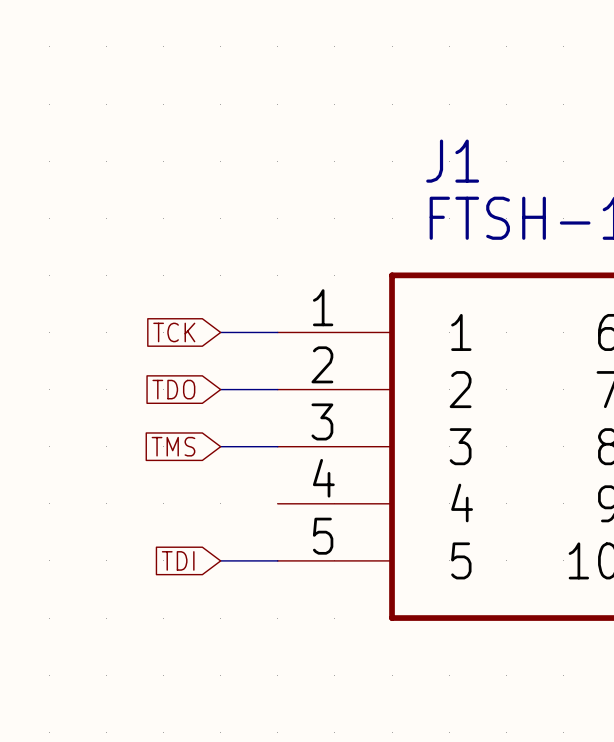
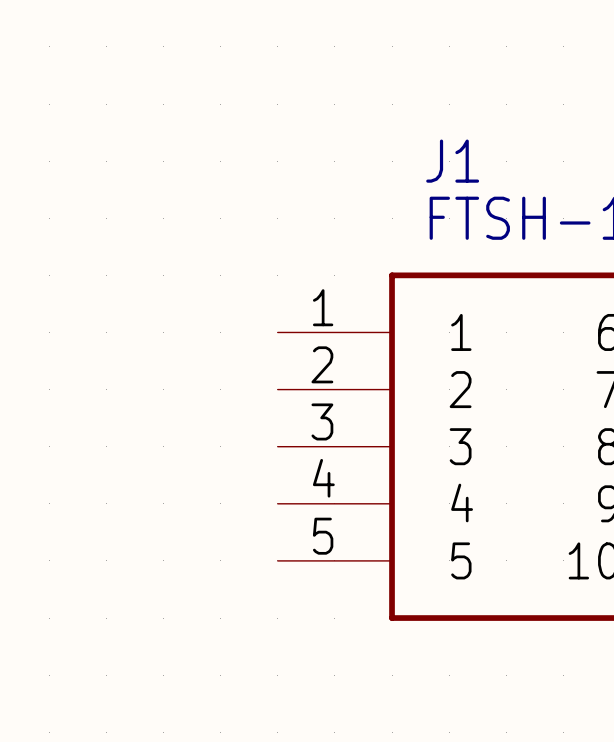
global label: TCK (174, 332) -> none
wire: (220, 332) (277, 332) -> none
global label: TDO (173, 389) -> none
wire: (220, 389) (277, 389) -> none
global label: TMS (173, 446) -> none
wire: (220, 446) (277, 446) -> none
global label: TDI (178, 560) -> none
wire: (220, 560) (277, 560) -> none

